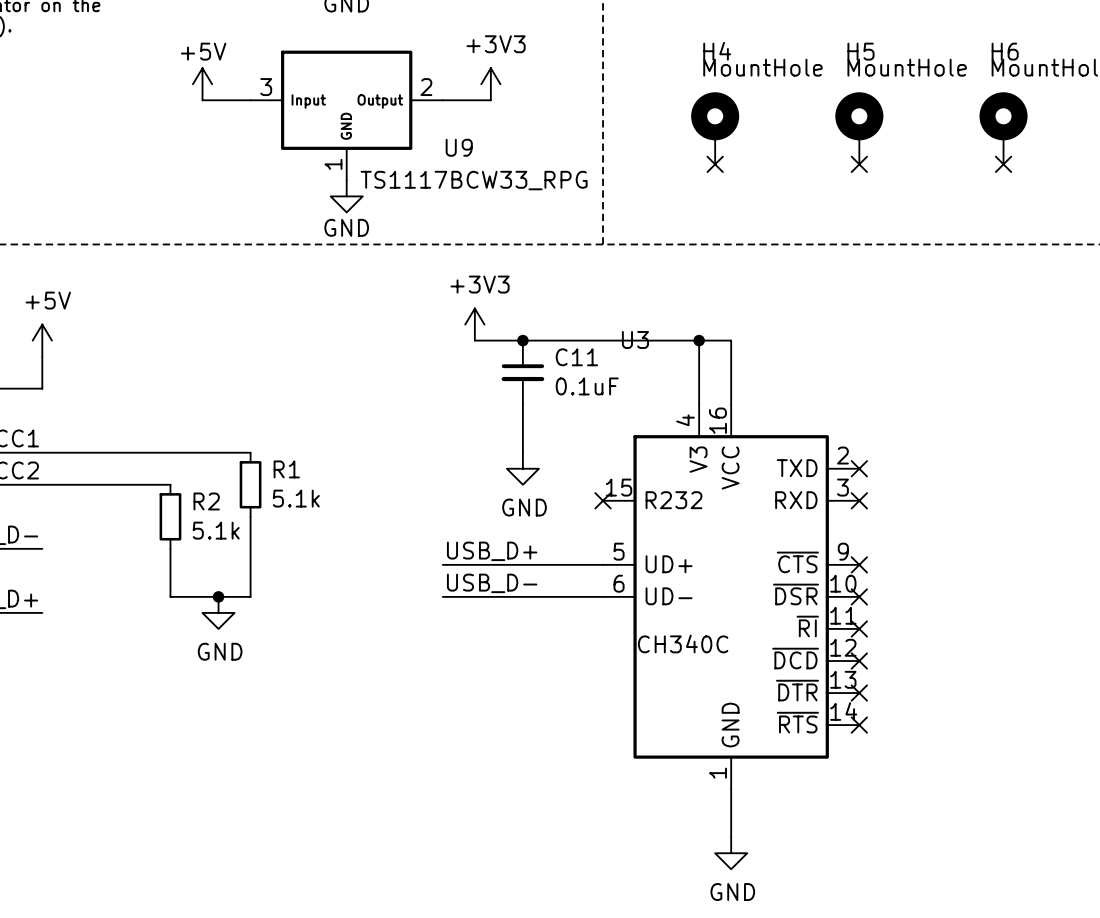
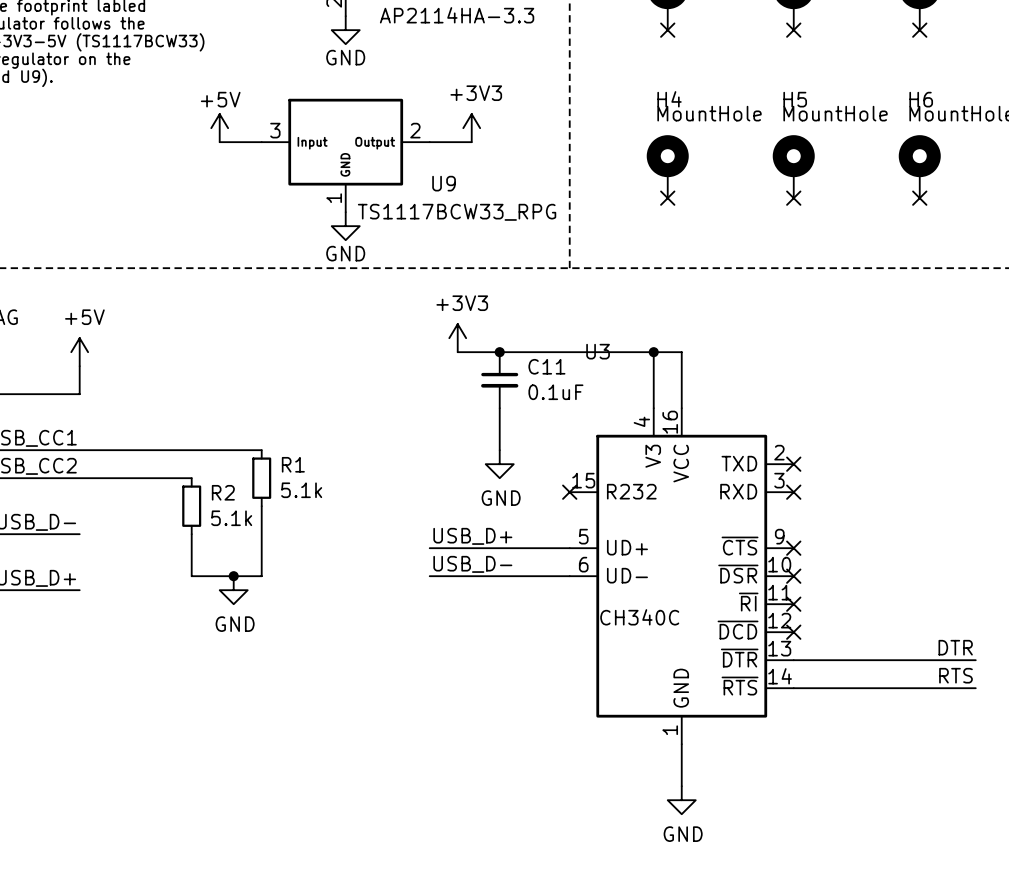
label: none -> DTR (955, 647)
wire: none -> (793, 660) (975, 660)
no-connect mark: (859, 693) -> none
label: none -> RTS (955, 675)
wire: none -> (793, 688) (975, 688)
no-connect mark: (859, 725) -> none

